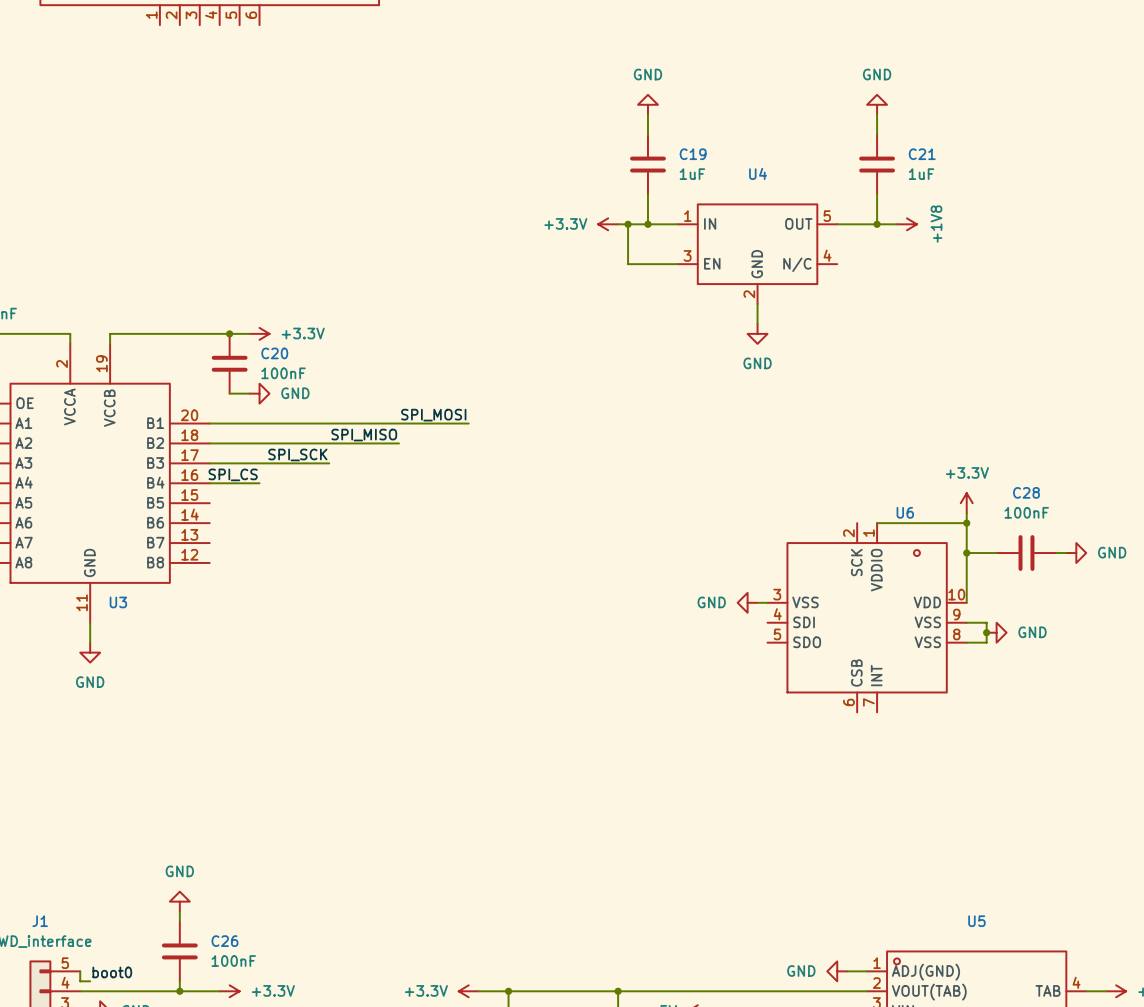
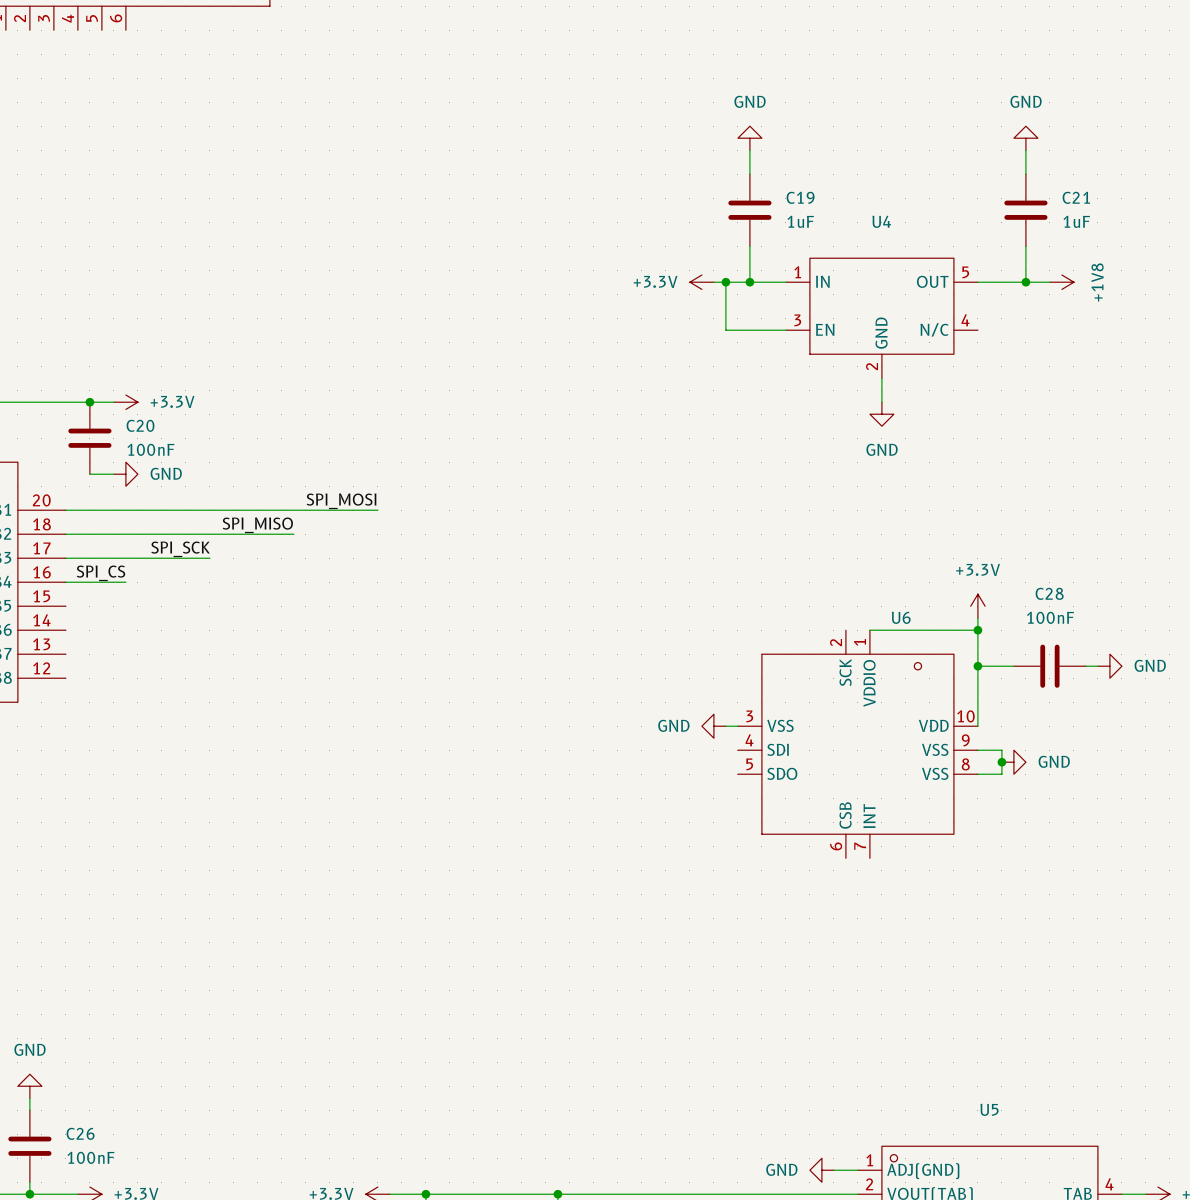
power symbol: GND (647, 104) -> none
power symbol: GND (877, 104) -> none
wire: (647, 114) (647, 134) -> (749, 150) (749, 174)
power symbol: none -> GND (749, 138)
wire: (877, 114) (877, 134) -> (1025, 150) (1025, 174)
power symbol: none -> GND (1025, 138)
C19 position: (647, 164) -> (749, 210)
C21 position: (877, 164) -> (1025, 210)
wire: (647, 194) (647, 224) -> (749, 246) (749, 282)
wire: (877, 194) (877, 224) -> (1025, 246) (1025, 282)
power symbol position: +3.3V (608, 224) -> +3.3V (701, 282)
wire: (618, 224) (677, 224) -> (713, 282) (785, 282)
wire: (628, 224) (628, 264) (677, 264) -> (725, 282) (725, 330) (785, 330)
junction: (628, 224) -> none
junction: (647, 224) -> none
wire: (837, 224) (897, 224) -> (977, 282) (1049, 282)
junction: (877, 224) -> none
power symbol position: +1V8 (906, 224) -> +1V8 (1061, 282)
junction: none -> (725, 282)
junction: none -> (749, 282)
junction: none -> (1025, 282)
U4 position: (757, 254) -> (881, 318)
wire: (757, 304) (757, 323) -> (881, 378) (881, 402)
power symbol: GND (757, 333) -> none
power symbol: none -> GND (881, 414)

